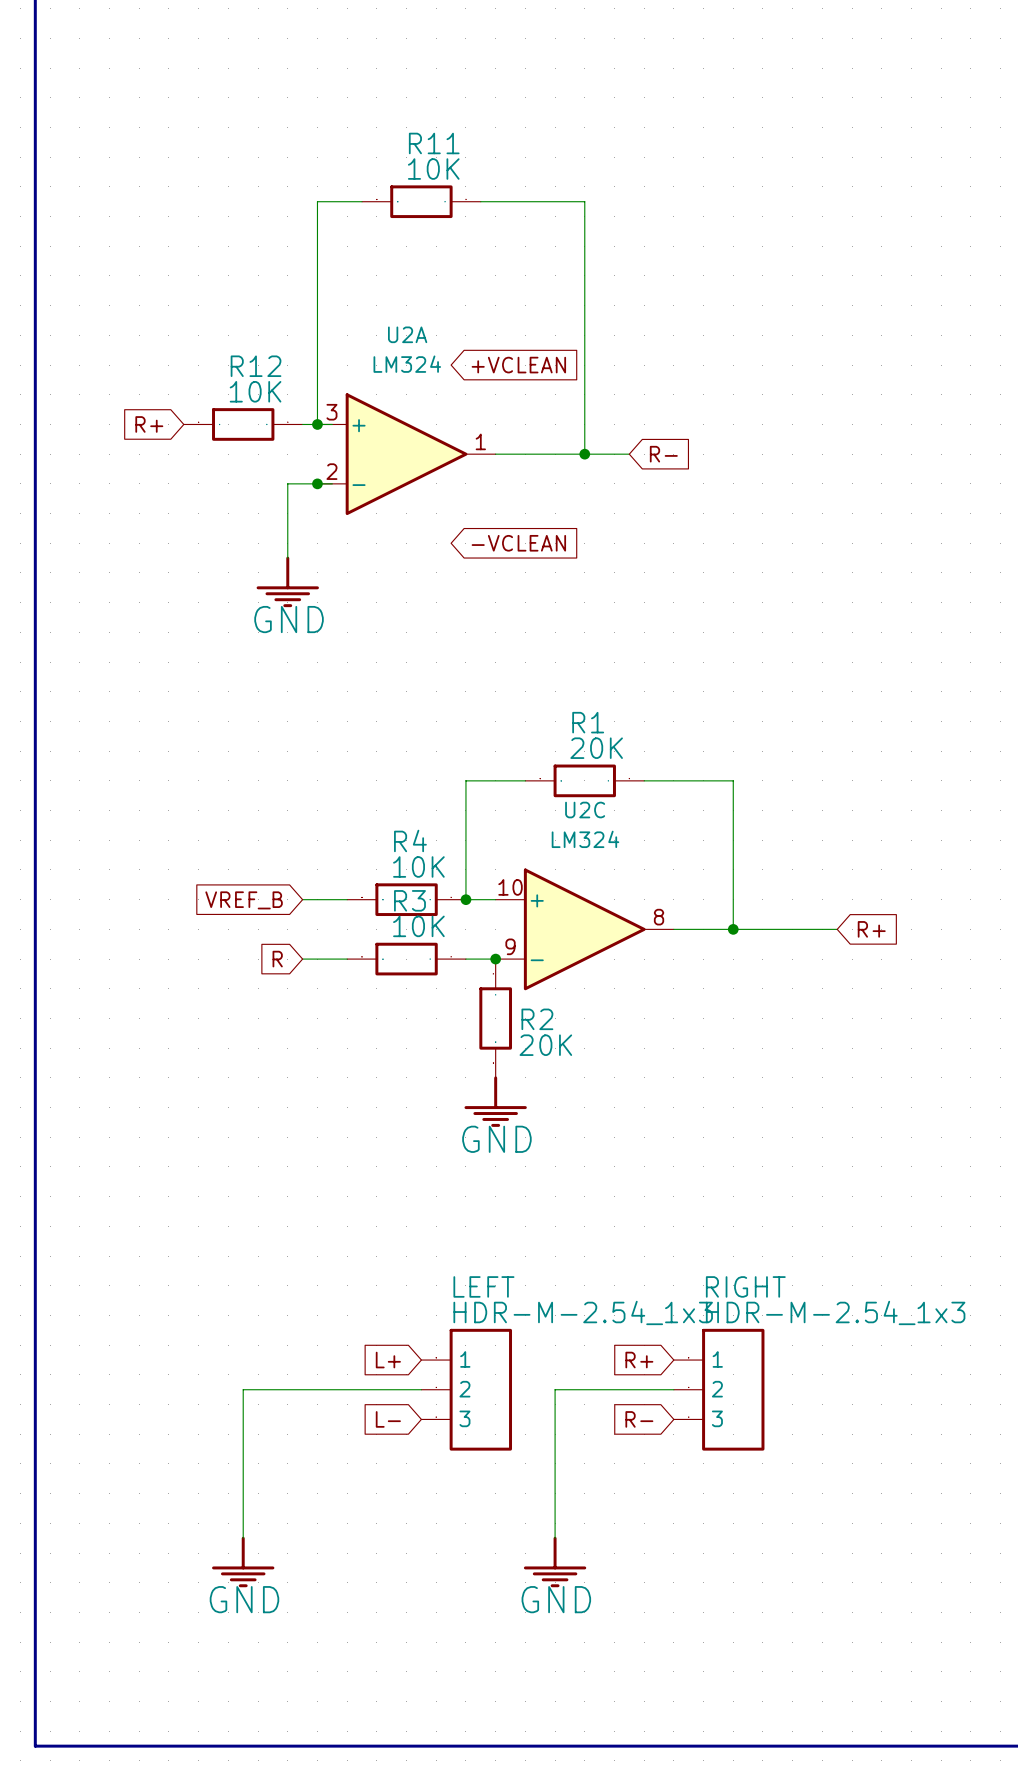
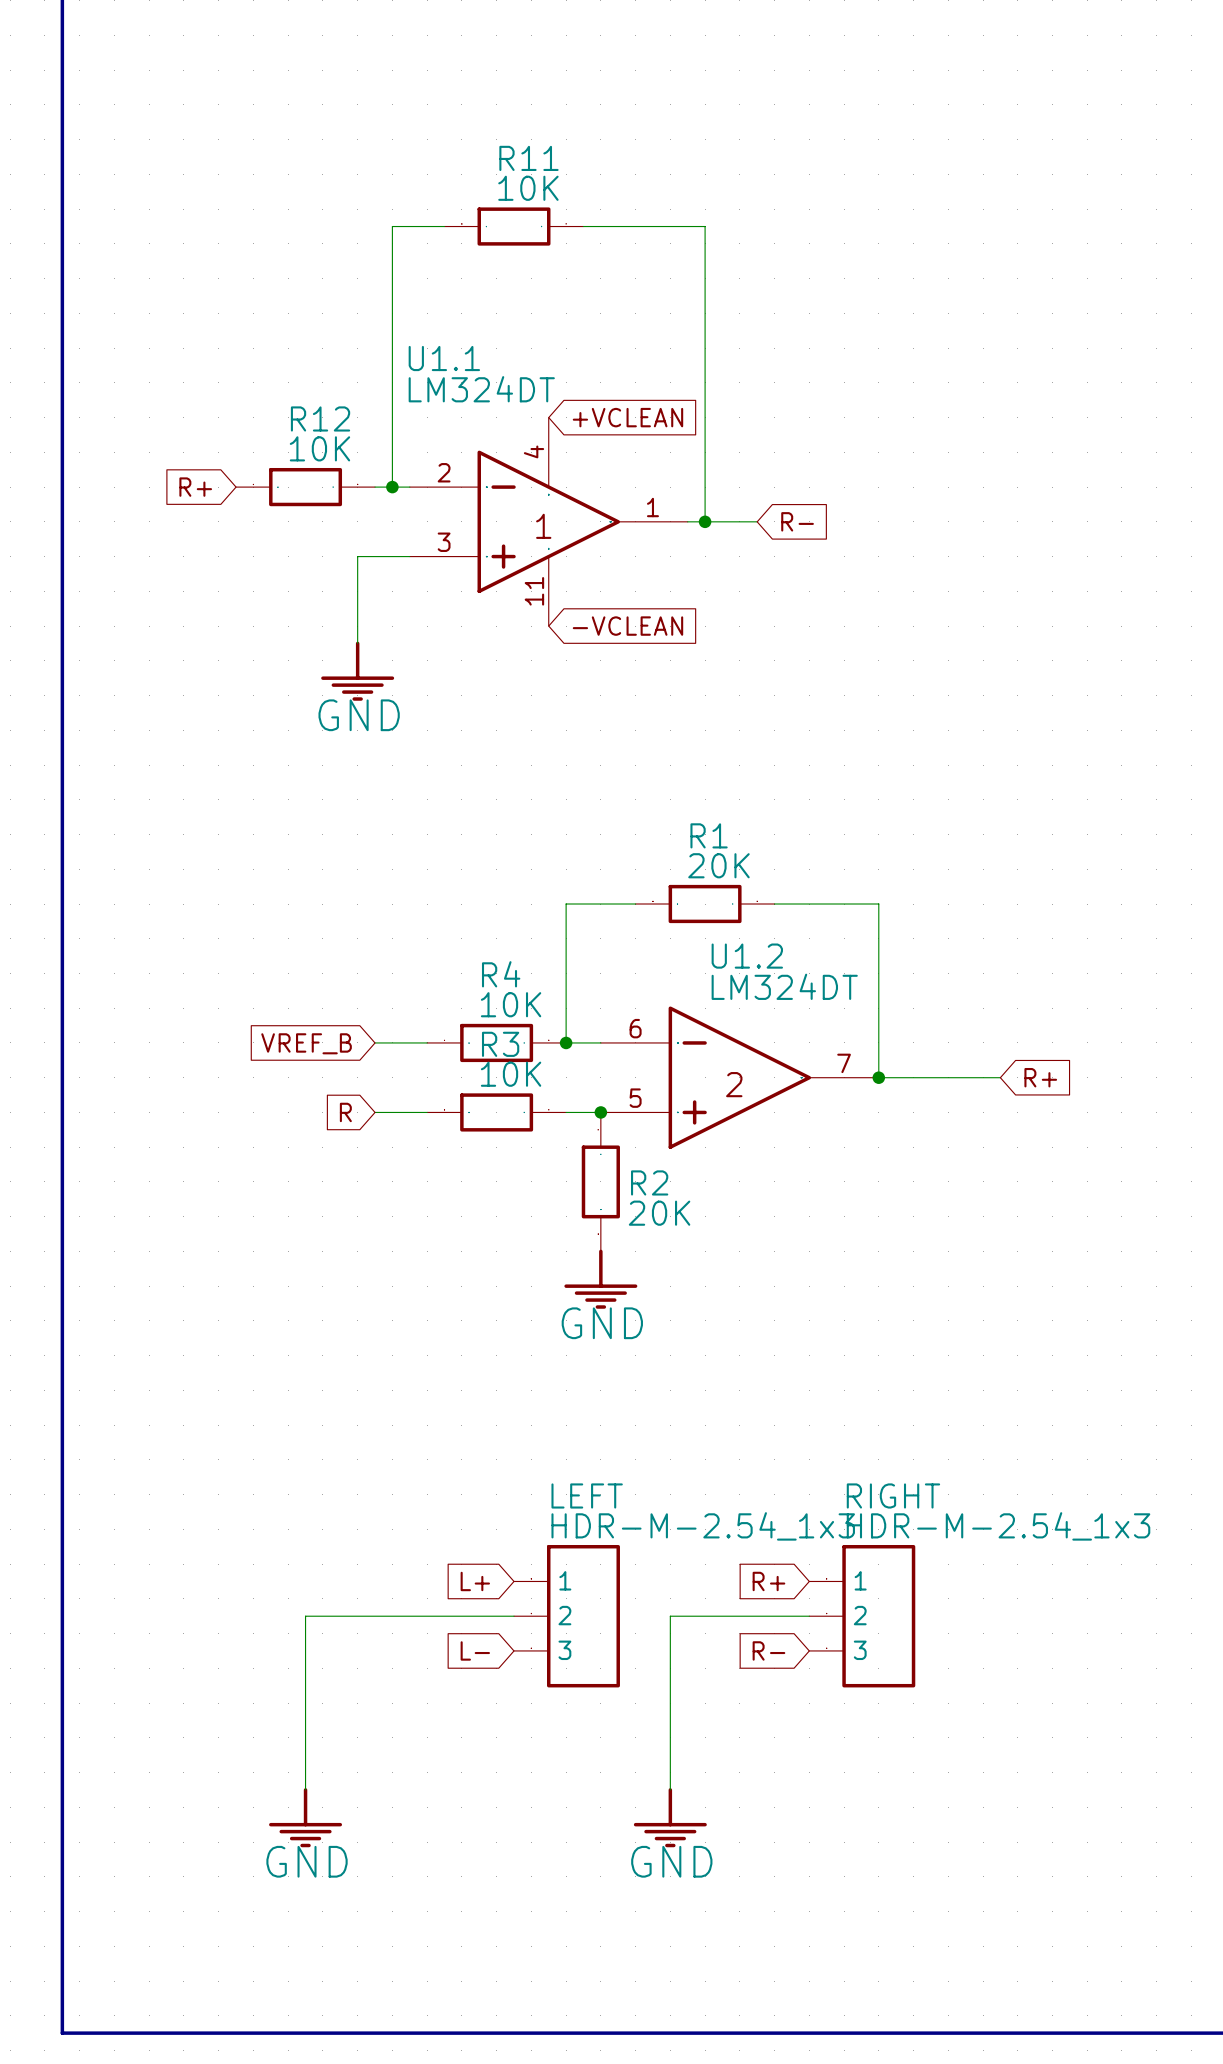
U2A: LM324 (406, 454) -> none
U1.1: none -> LM324DT (548, 521)
junction: (317, 483) -> none
U2C: LM324 (584, 929) -> none
U1.2: none -> LM324DT (739, 1077)

